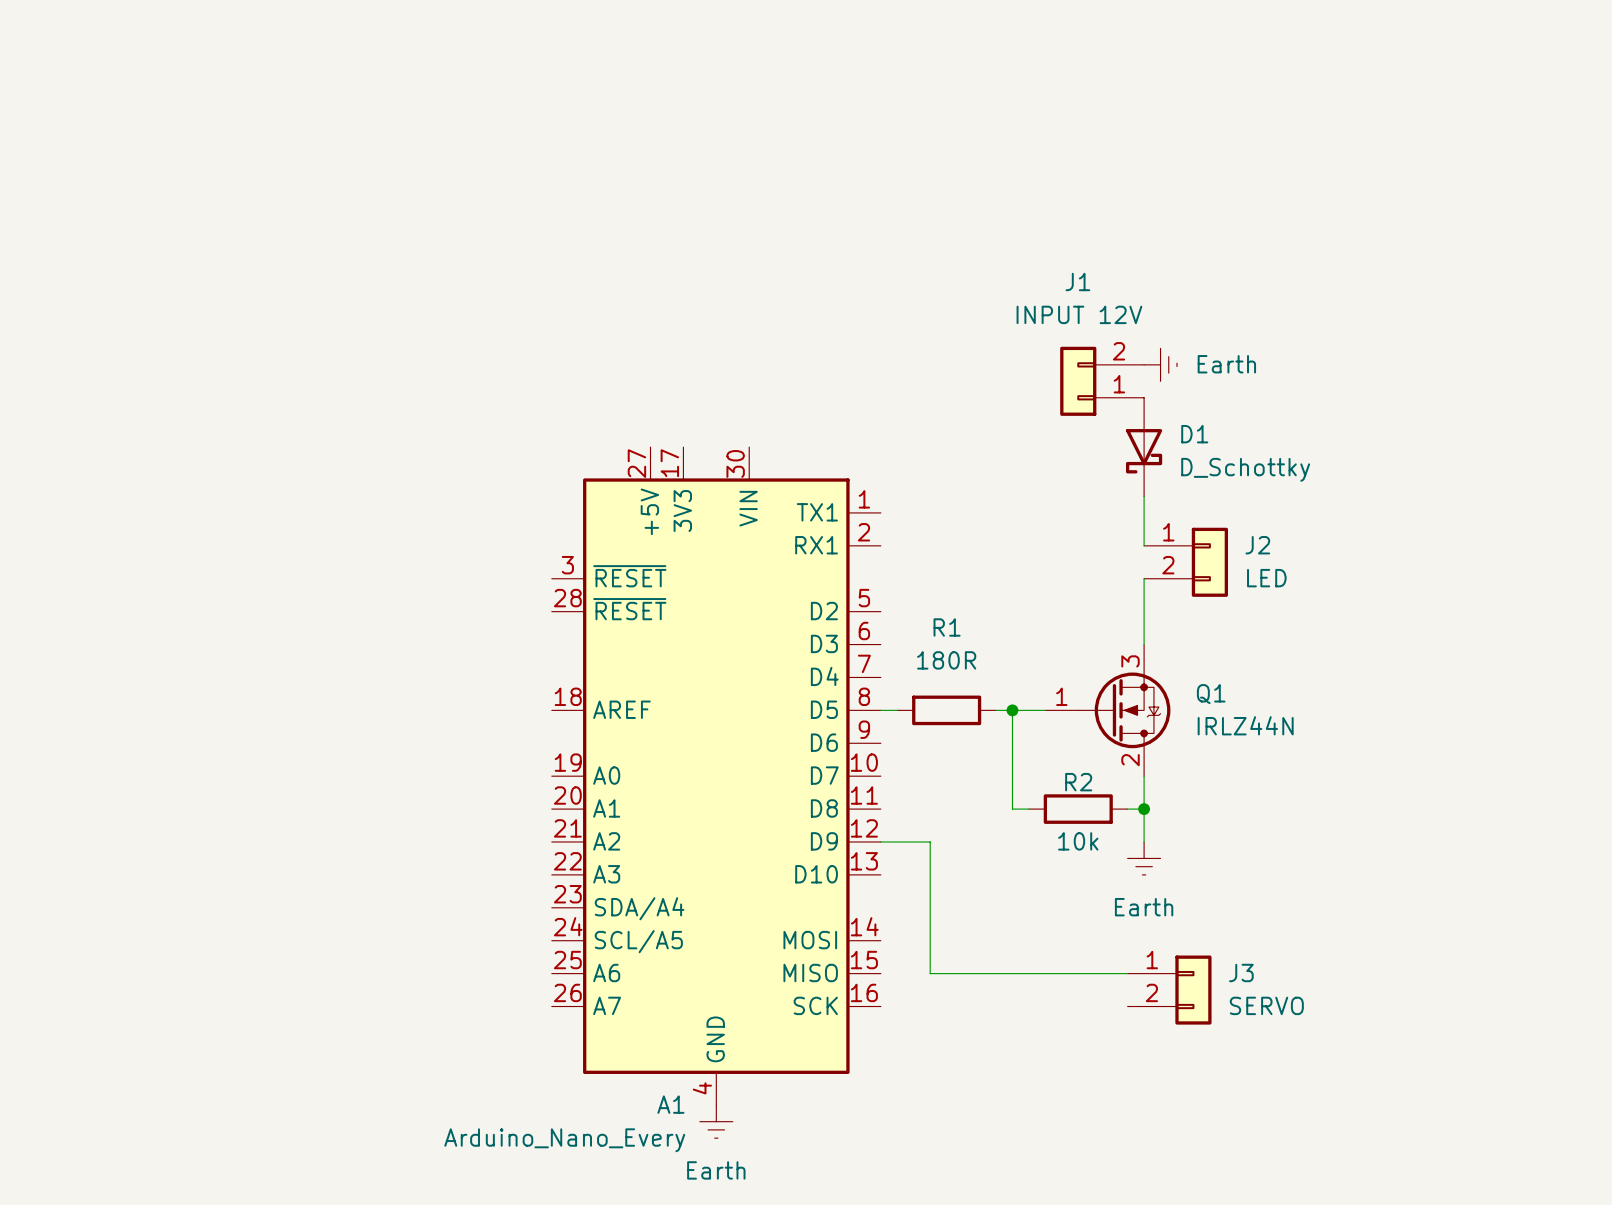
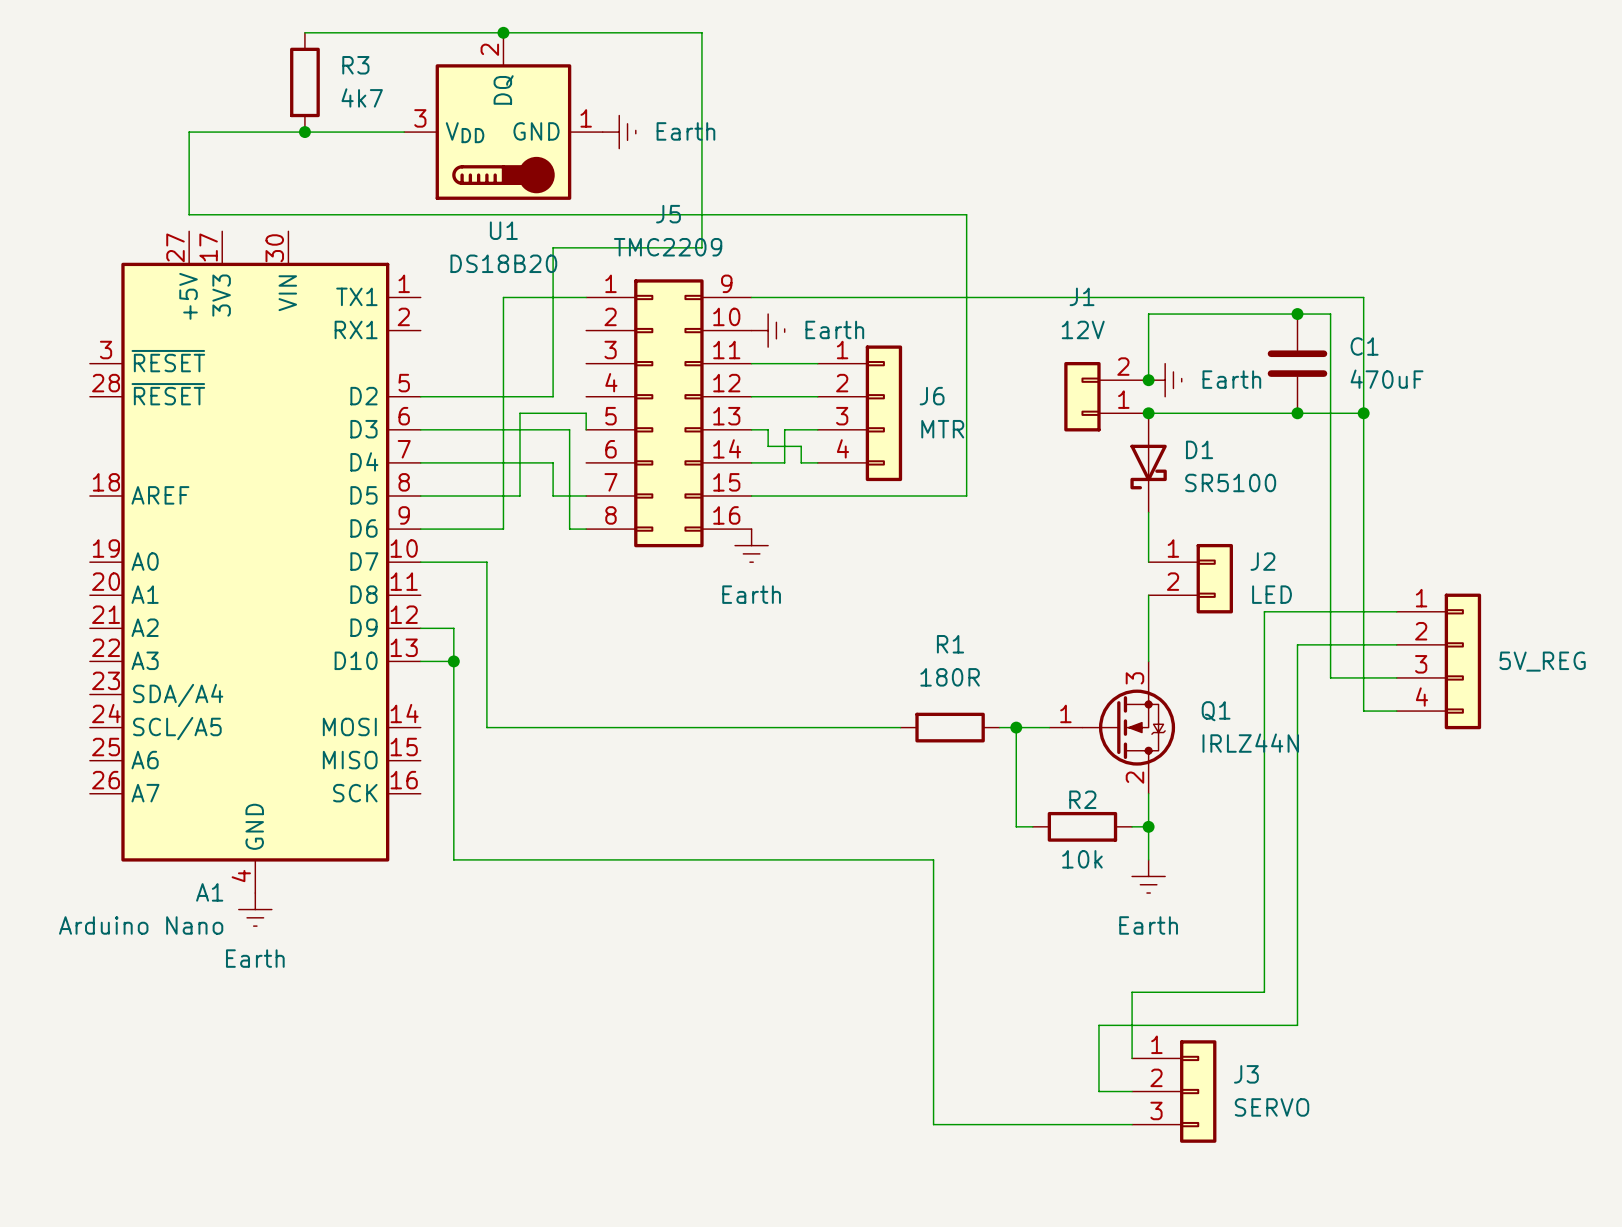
wire: none -> (304, 32) (701, 32) (701, 247) (553, 247) (553, 396) (420, 396)
junction: none -> (503, 32)
R3: none -> 4k7 (304, 82)
U1: none -> DS18B20 (503, 116)
junction: none -> (304, 132)
wire: none -> (404, 132) (189, 132) (189, 214) (966, 214) (966, 495) (751, 495)
power symbol: none -> Earth (619, 132)
wire: none -> (586, 297) (503, 297) (503, 529) (420, 529)
wire: none -> (751, 297) (1363, 297) (1363, 711) (1396, 711)
junction: none -> (1297, 314)
J1 value: INPUT 12V (1079, 314) -> 12V (1083, 329)
power symbol: none -> Earth (768, 330)
wire: none -> (751, 363) (817, 363)
C1: none -> 470uF (1297, 363)
wire: none -> (1148, 380) (1148, 314) (1330, 314) (1330, 677) (1396, 677)
junction: none -> (1148, 380)
wire: none -> (751, 396) (817, 396)
J5: none -> TMC2209 (668, 413)
J6: none -> MTR (859, 413)
wire: none -> (1148, 413) (1363, 413)
junction: none -> (1148, 413)
junction: none -> (1297, 413)
junction: none -> (1363, 413)
wire: none -> (420, 429) (569, 429) (569, 529) (586, 529)
wire: none -> (586, 429) (586, 413) (519, 413) (519, 495) (420, 495)
wire: none -> (751, 429) (768, 429) (768, 446) (801, 446) (801, 462) (817, 462)
wire: none -> (817, 429) (784, 429) (784, 462) (751, 462)
wire: none -> (420, 462) (553, 462) (553, 495) (586, 495)
D1 value: D_Schottky (1245, 469) -> SR5100 (1230, 482)
power symbol: none -> Earth (751, 545)
wire: none -> (420, 562) (486, 562) (486, 727) (883, 727)
wire: none -> (1396, 611) (1264, 611) (1264, 992) (1132, 992) (1132, 1058)
wire: none -> (420, 628) (453, 628) (453, 859) (883, 859)
wire: none -> (1396, 644) (1297, 644) (1297, 1025) (1098, 1025) (1098, 1091) (1132, 1091)
wire: none -> (420, 661) (453, 661)
junction: none -> (453, 661)
part: none -> 5V_REG (1438, 661)
A1 position: (716, 776) -> (255, 562)
power symbol: none -> Earth (255, 909)
J3 symbol: [1127, 955, 1212, 1025] -> [1132, 1040, 1217, 1143]
wire: (930, 973) (1127, 973) -> (933, 992) (933, 1124) (1132, 1124)
power symbol: Earth (716, 1121) -> none
A1 value: Arduino_Nano_Every (564, 1140) -> Arduino Nano (141, 925)

